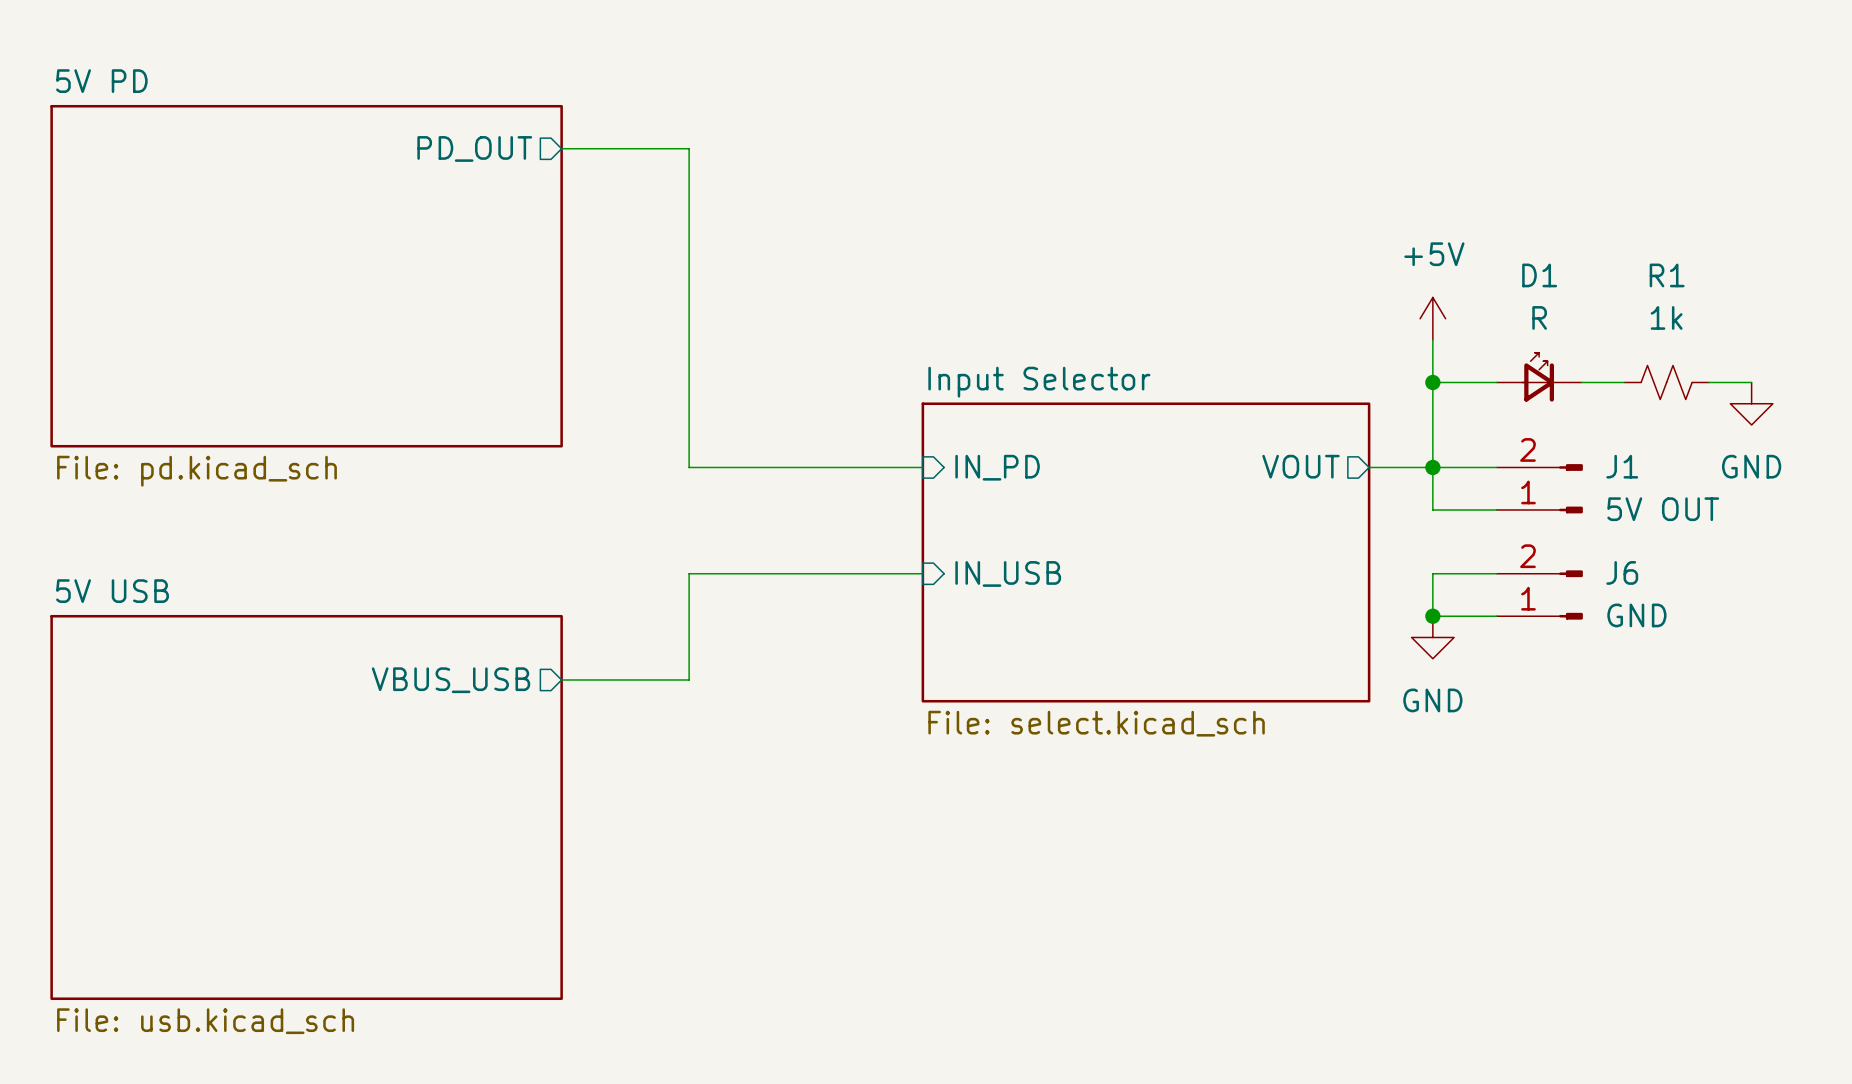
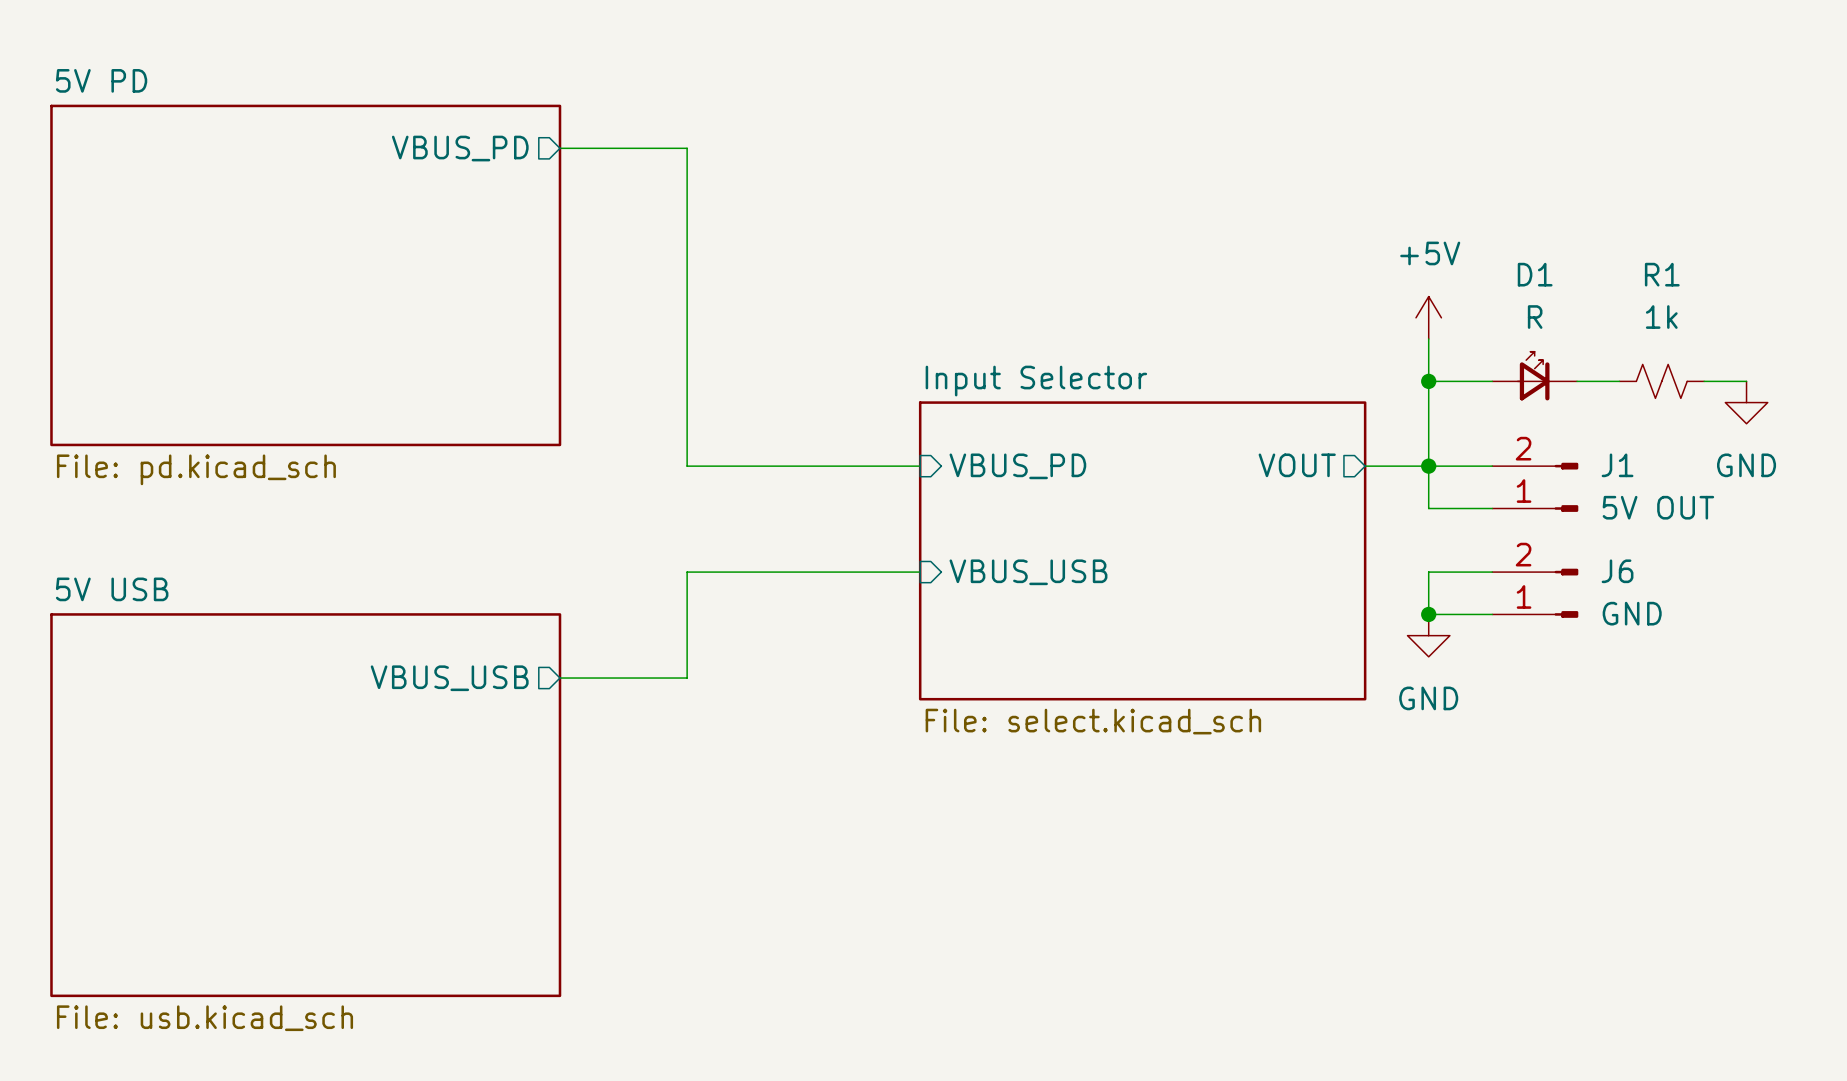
sheet pin: PD_OUT (474, 148) -> VBUS_PD (460, 148)
sheet pin: IN_PD (997, 467) -> VBUS_PD (1017, 466)
sheet pin: IN_USB (1008, 573) -> VBUS_USB (1028, 572)

